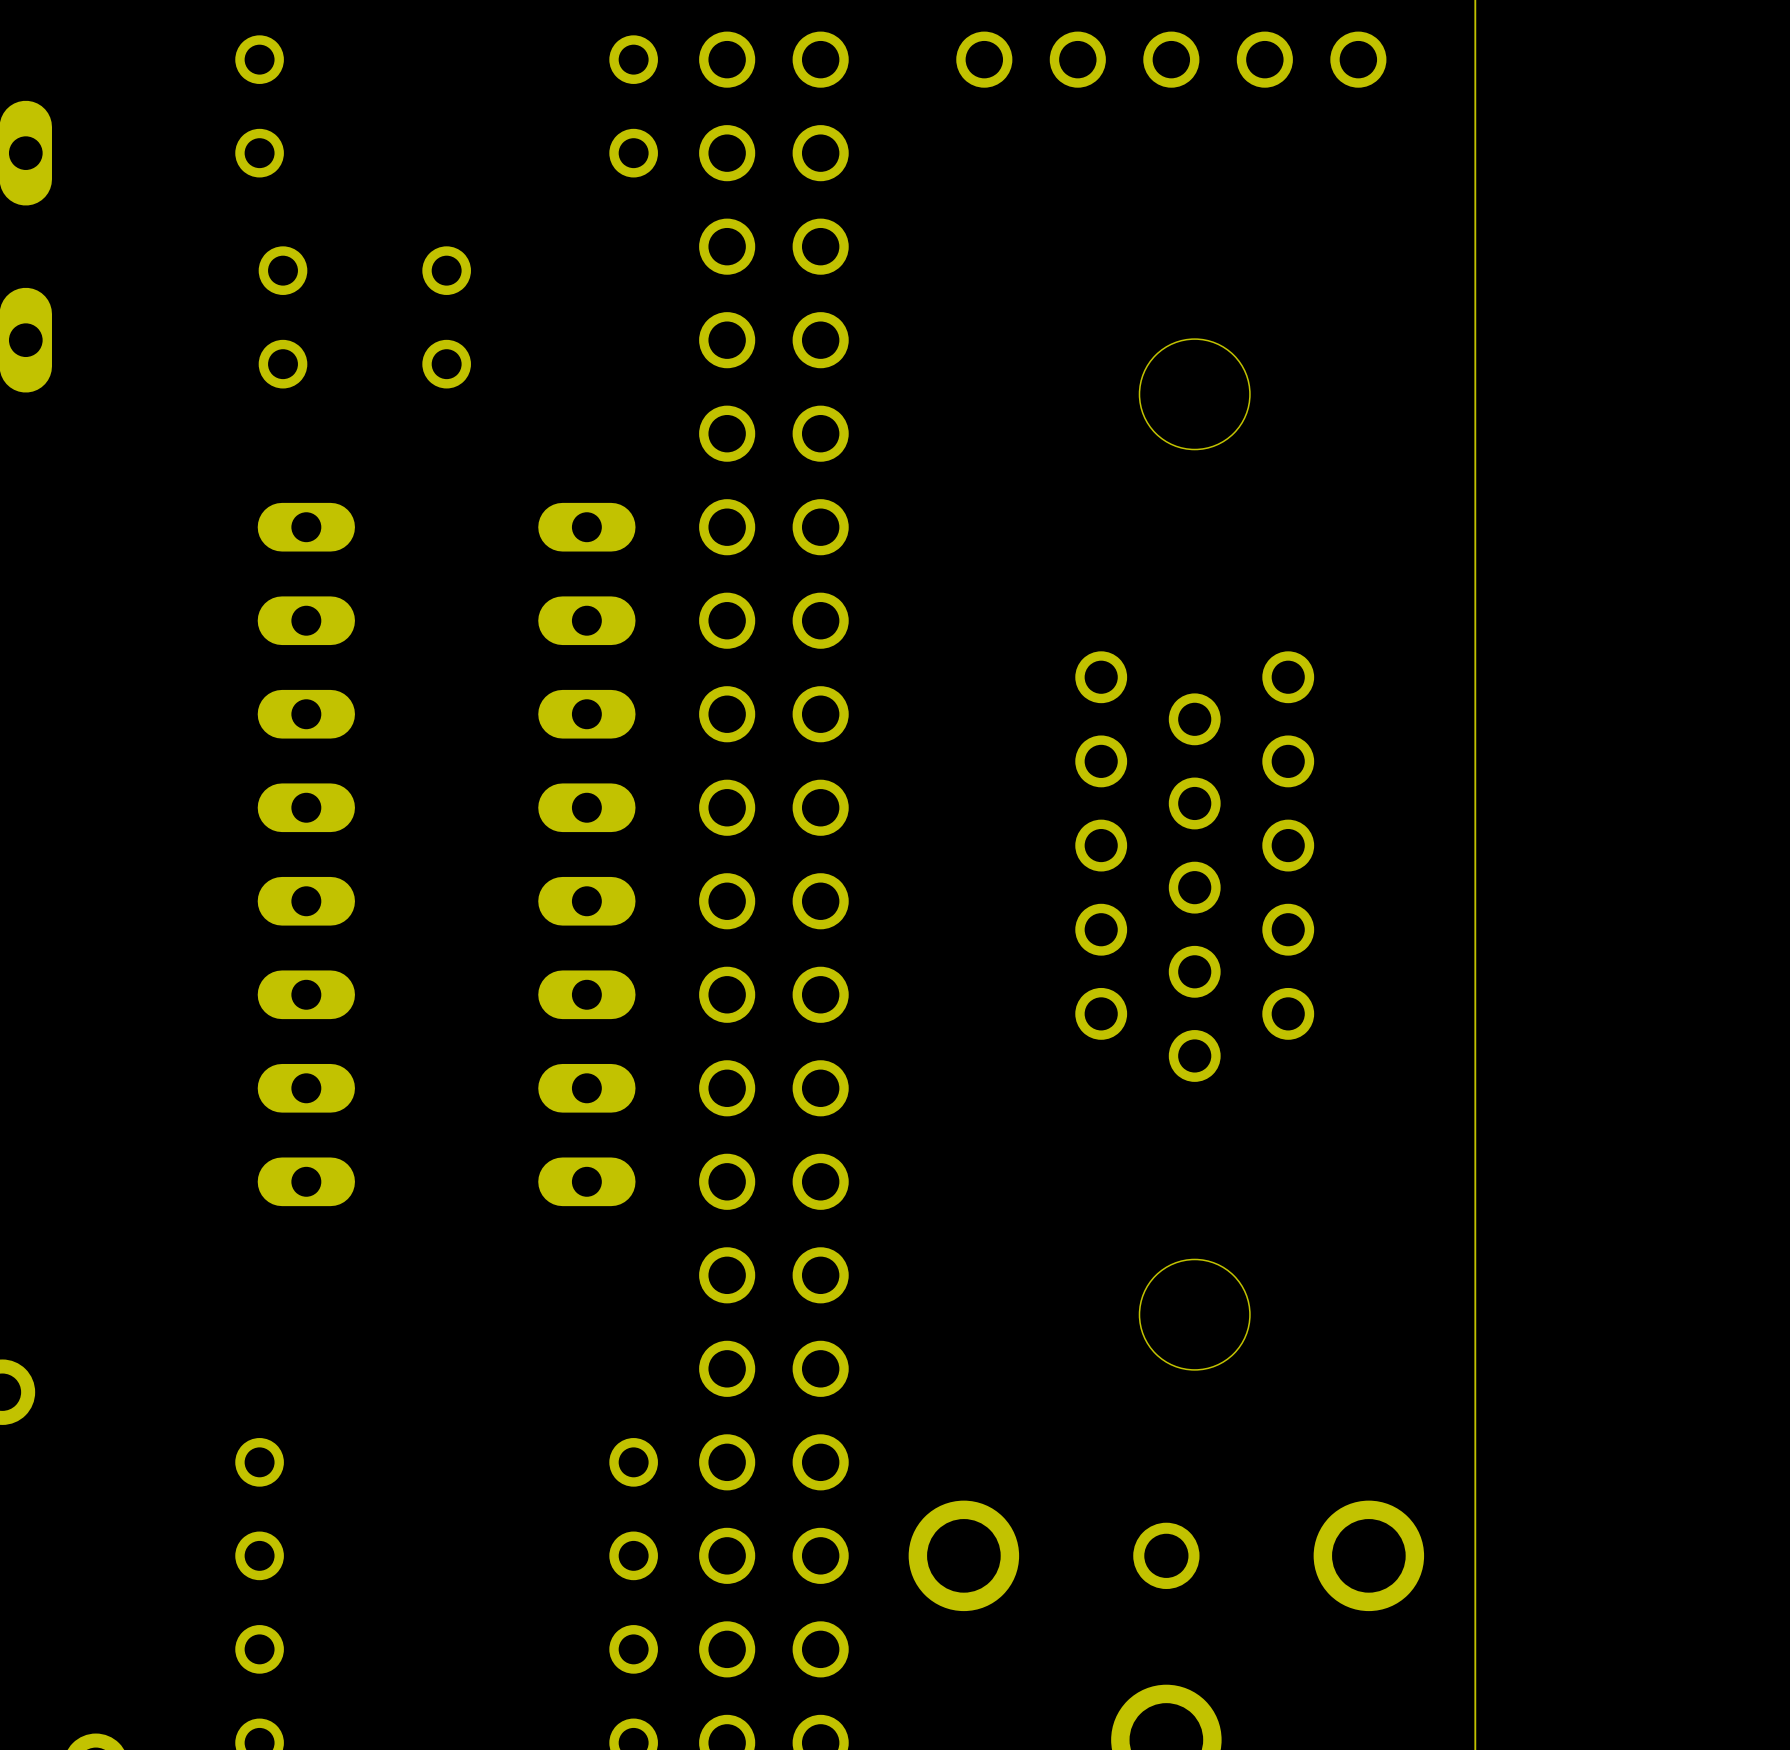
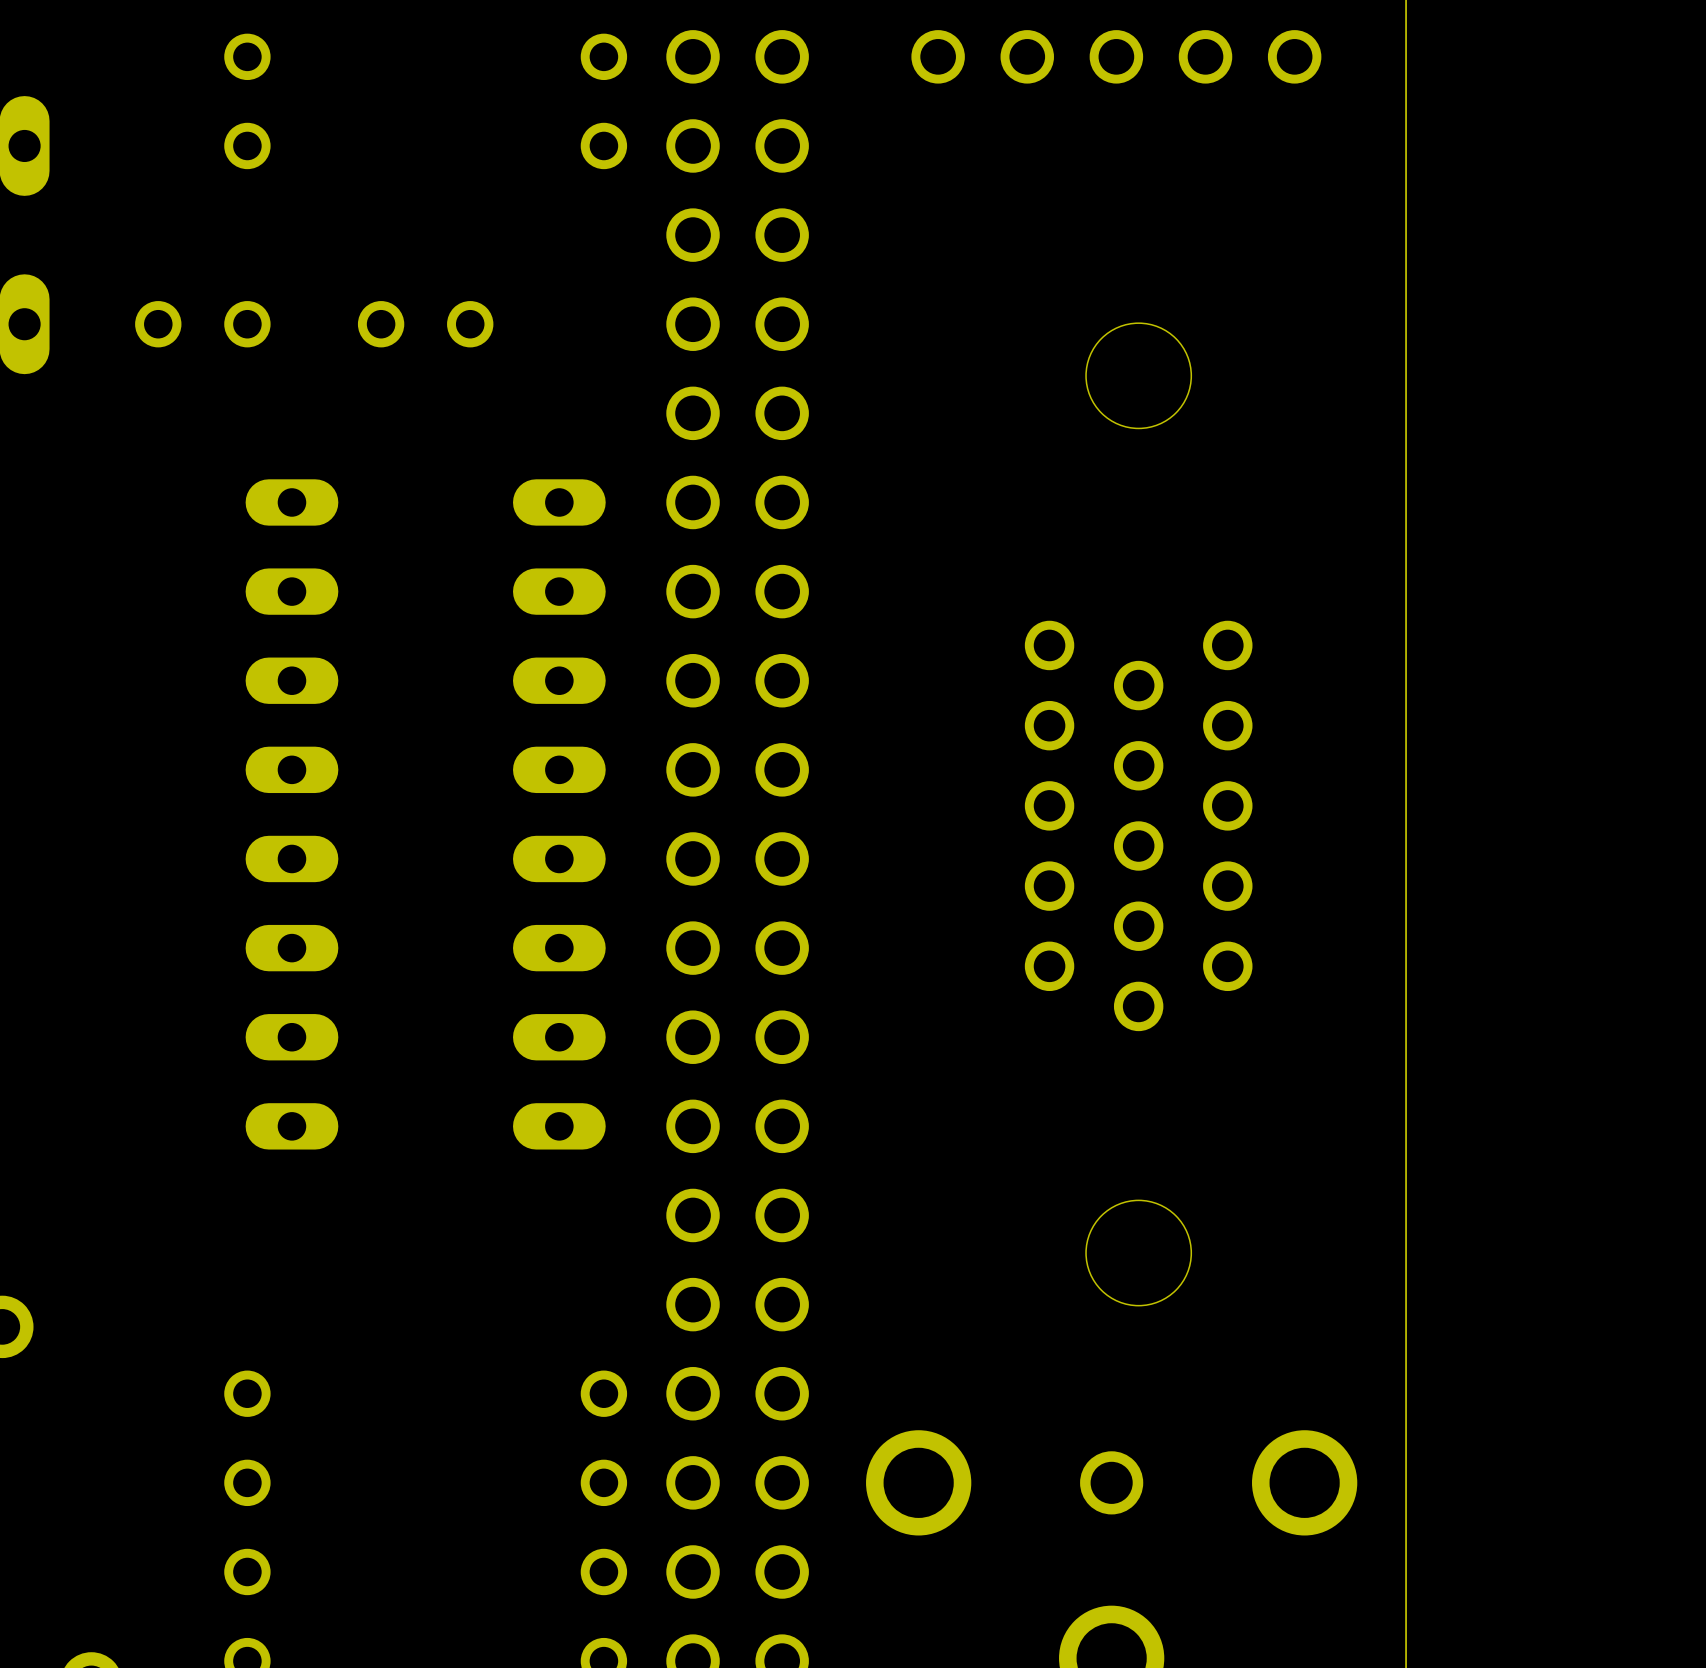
part rotation: 0° (283, 317) -> 90° clockwise (202, 324)
part rotation: 0° (446, 317) -> 90° clockwise (425, 324)

